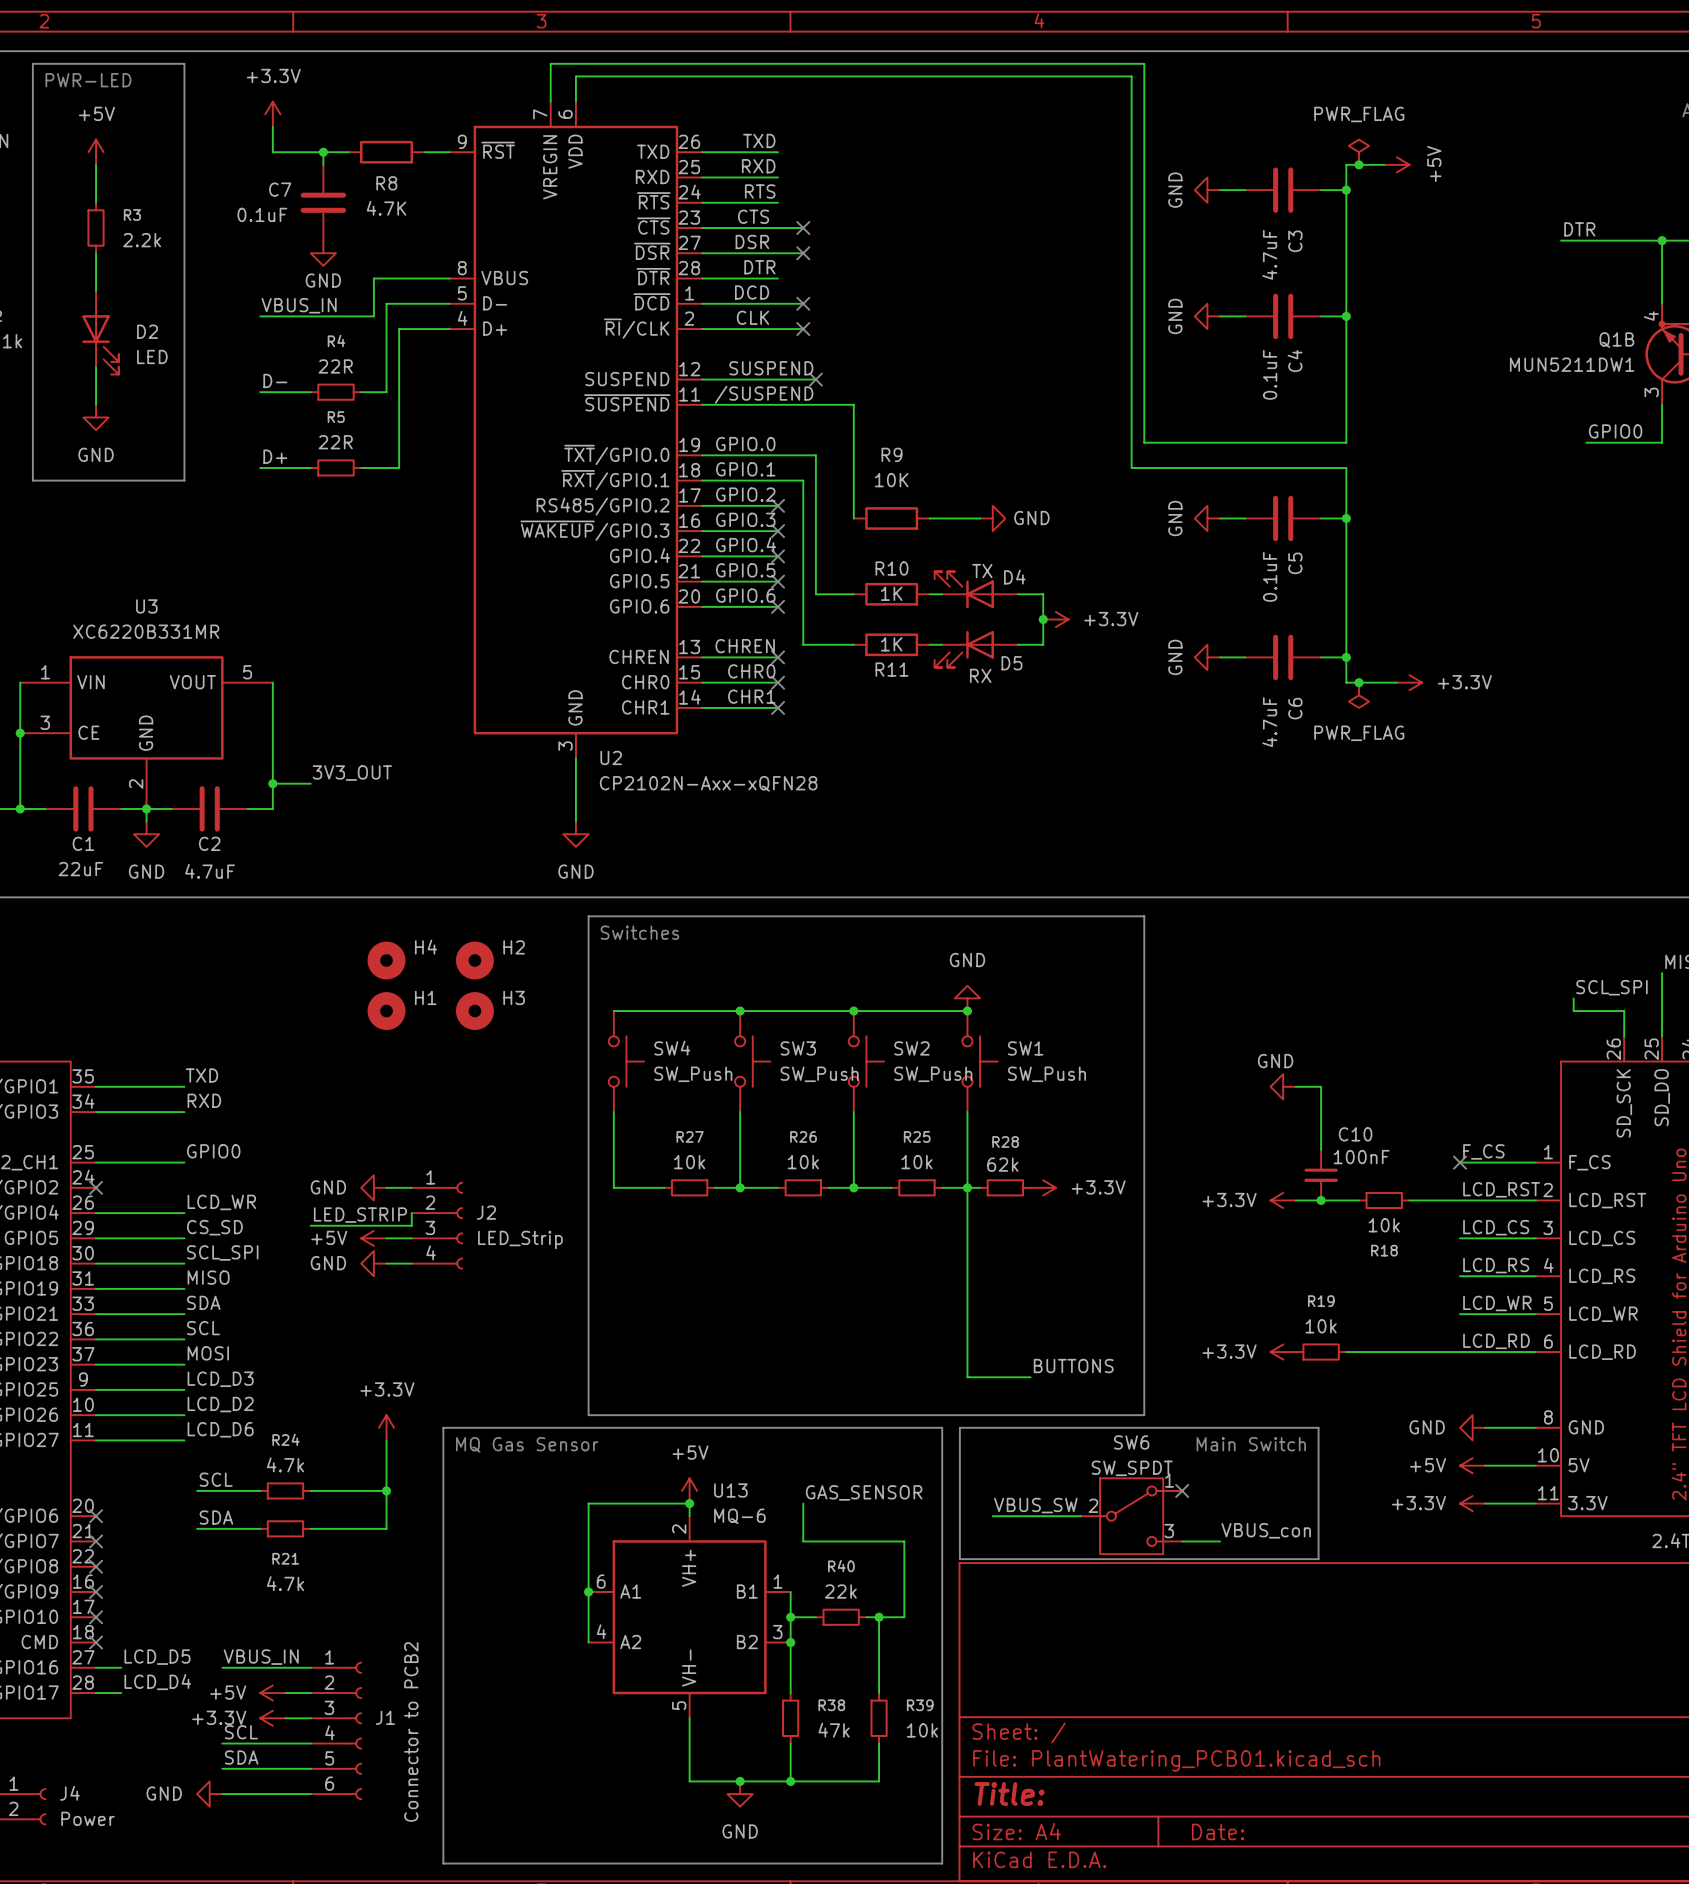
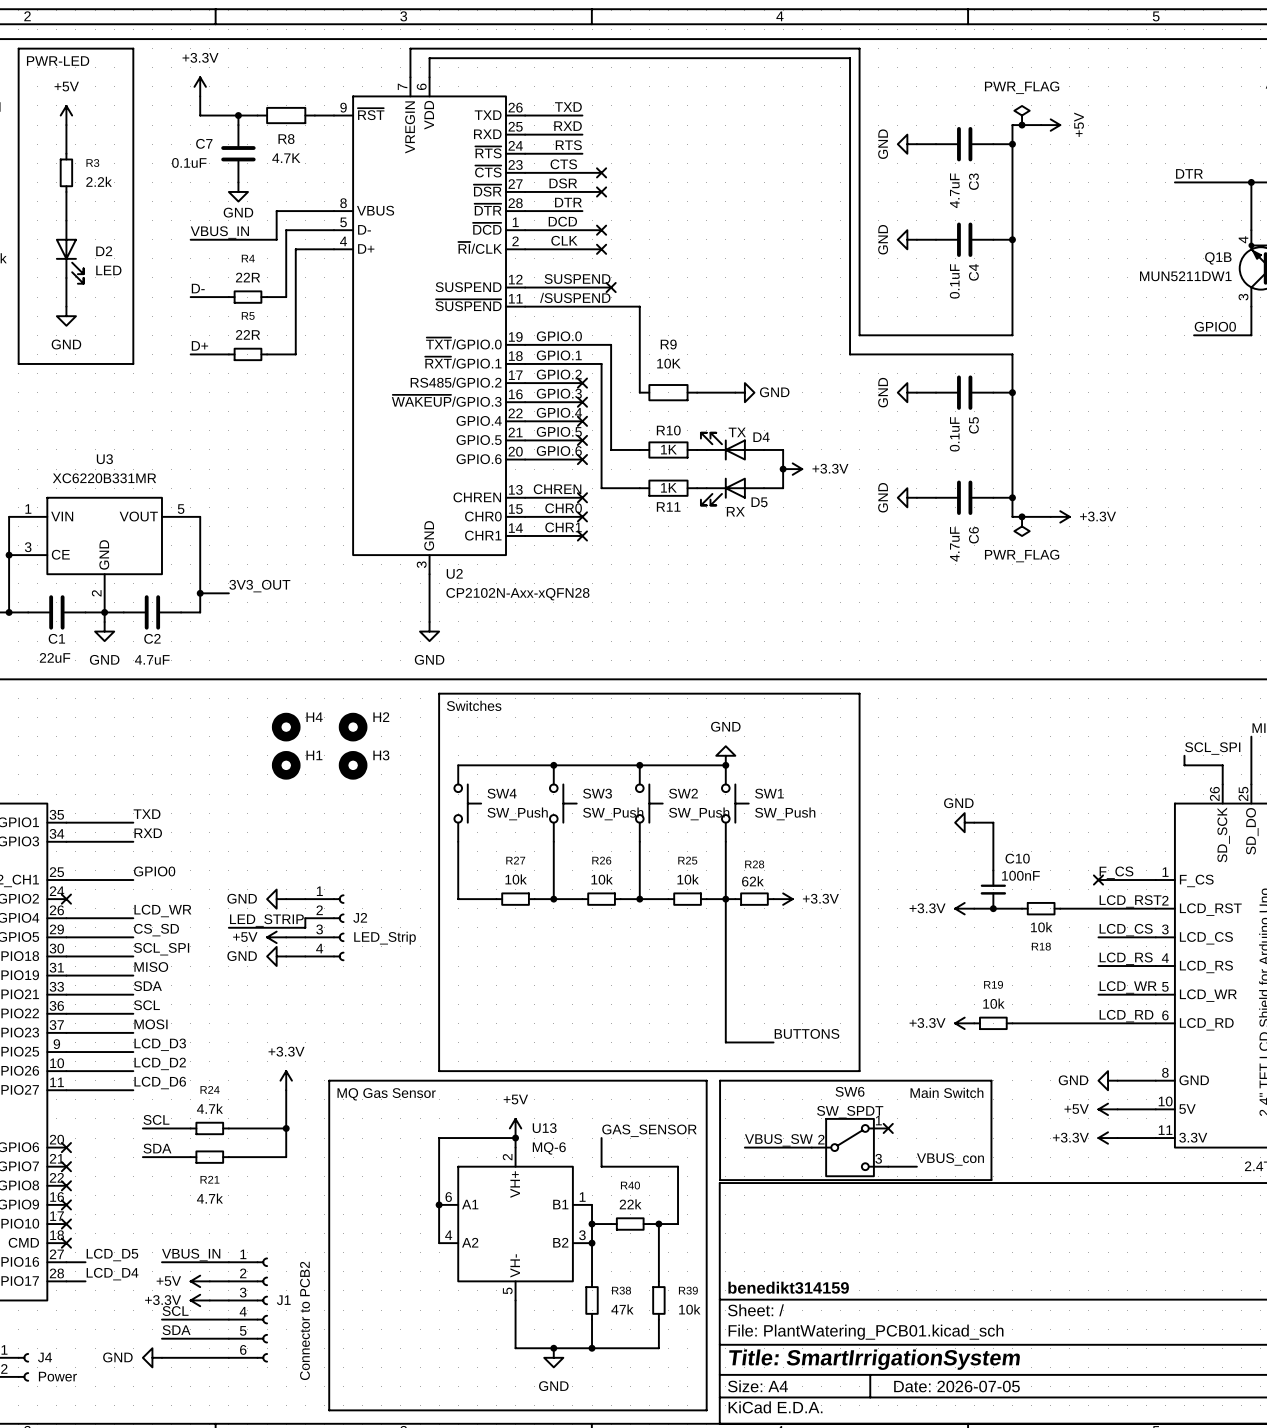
title block: none -> benedikt314159 (788, 1287)
title block: Title: (1009, 1794) -> Title: SmartIrrigationSystem (874, 1359)
title block: Date: (1218, 1831) -> Date: 2026-07-05 (957, 1386)

